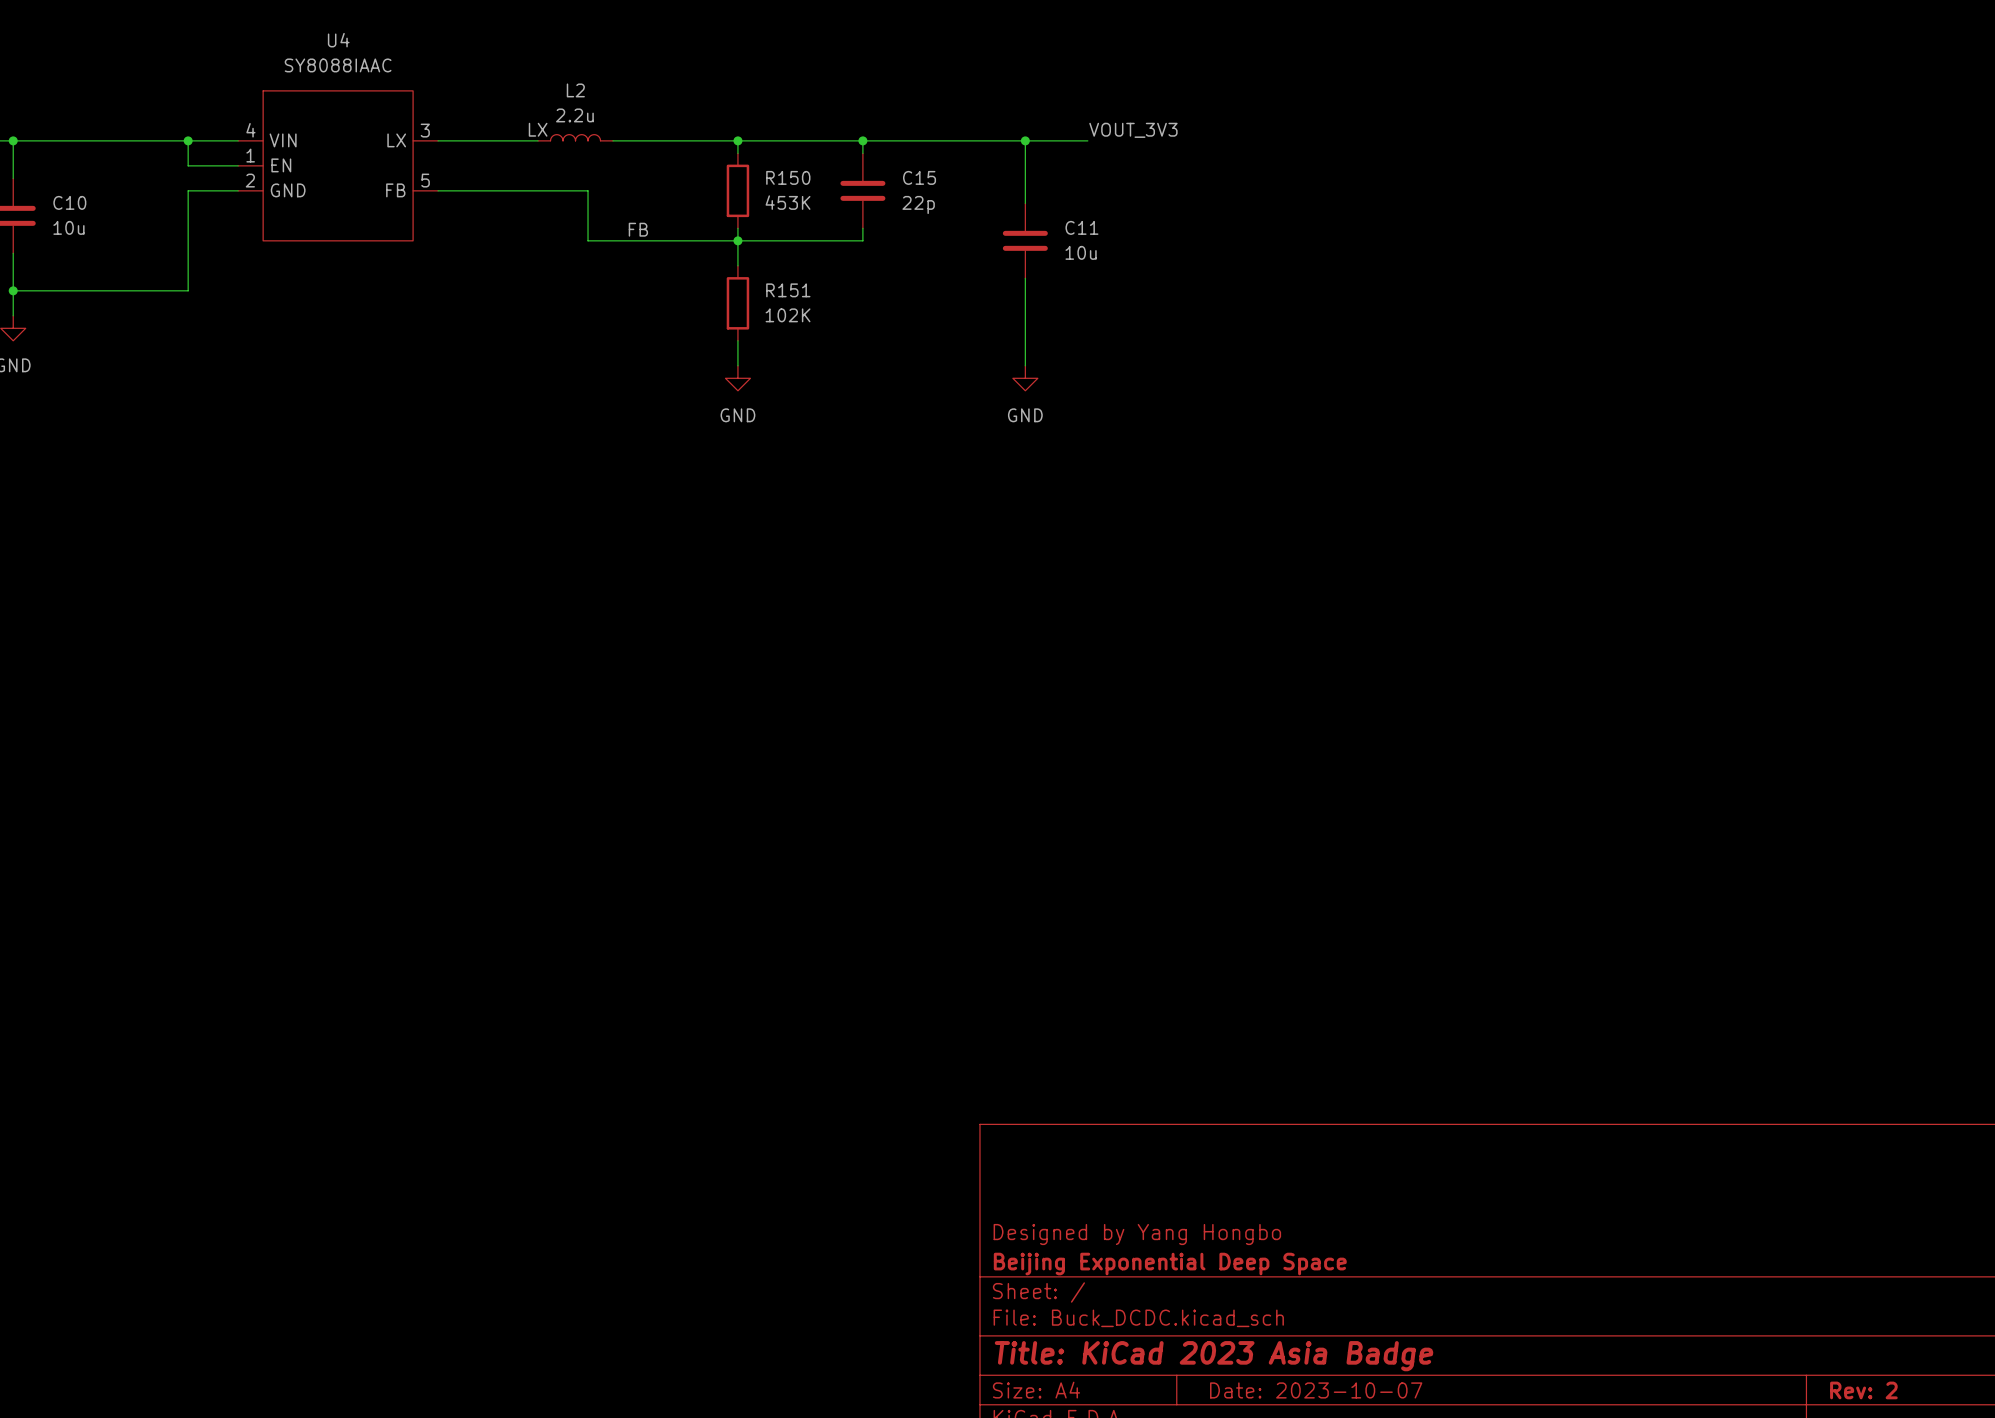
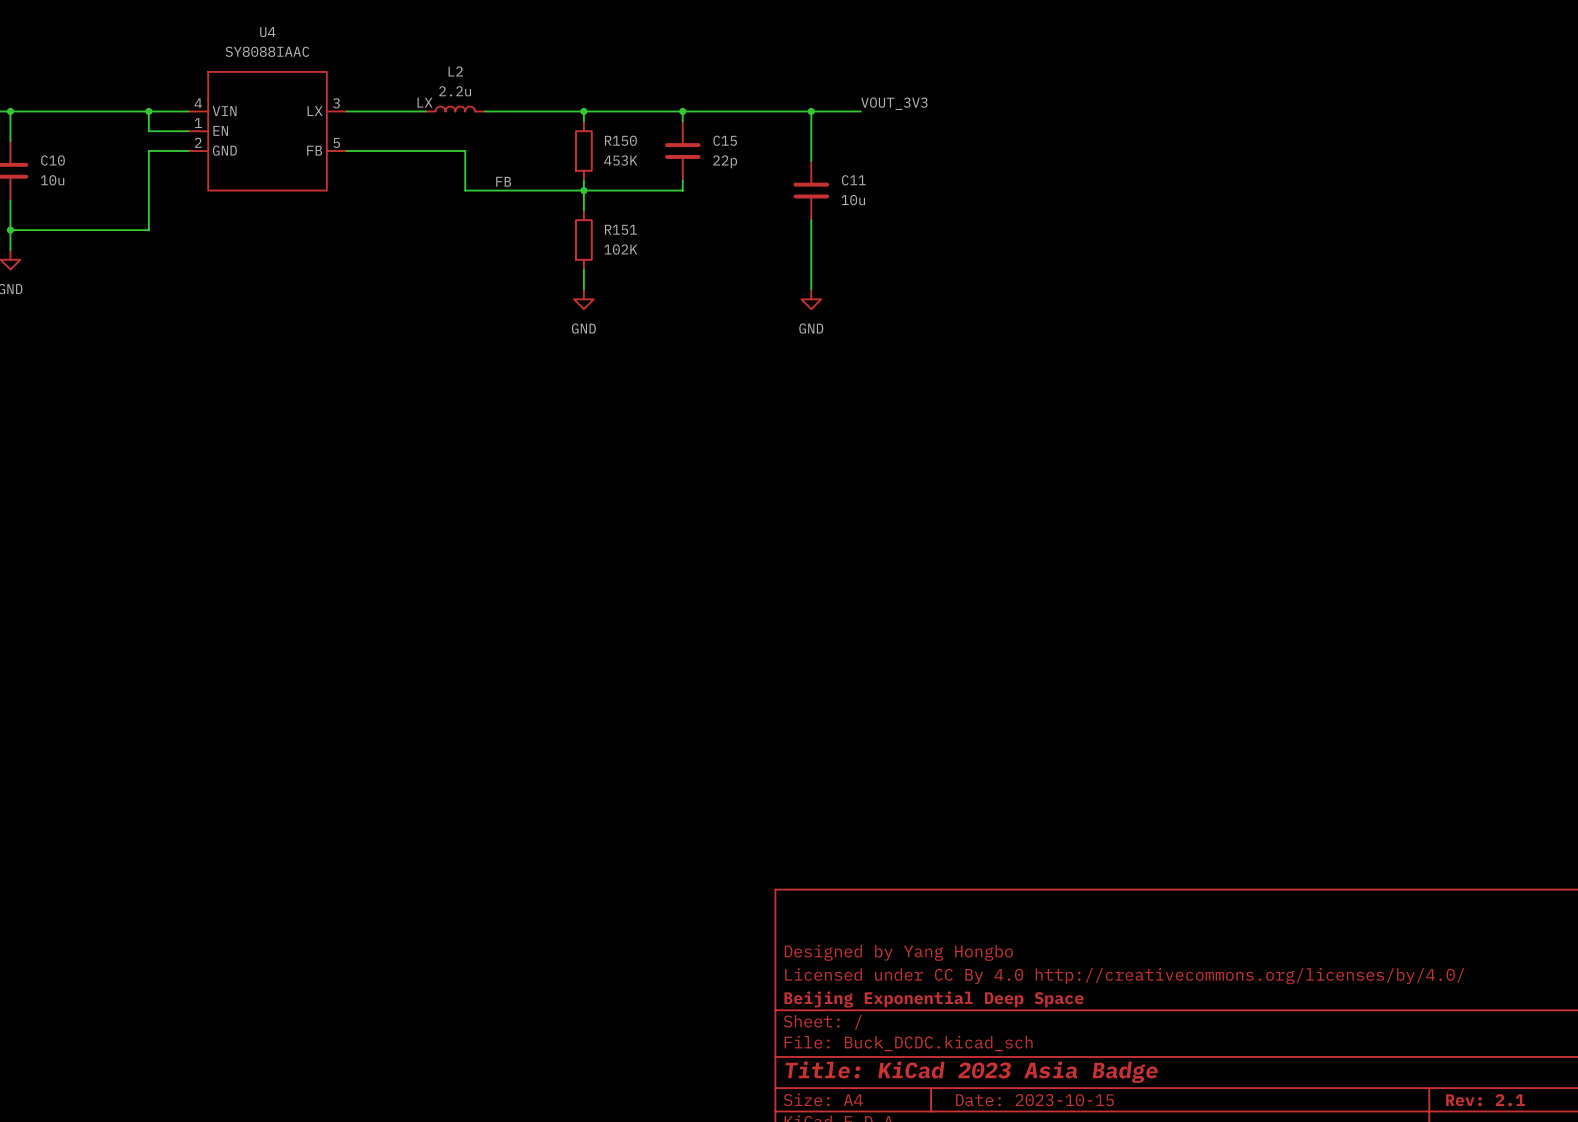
title block: none -> Designed by Yang Hongbo (898, 952)
title block: Designed by Yang Hongbo (1137, 1234) -> Licensed under CC By 4.0 http://creativecommons.org/licenses/by/4.0/ (1124, 976)
title block: Date: 2023-10-07 (1316, 1390) -> Date: 2023-10-15 (1034, 1100)
title block: Rev: 2 (1863, 1390) -> Rev: 2.1 (1485, 1100)

